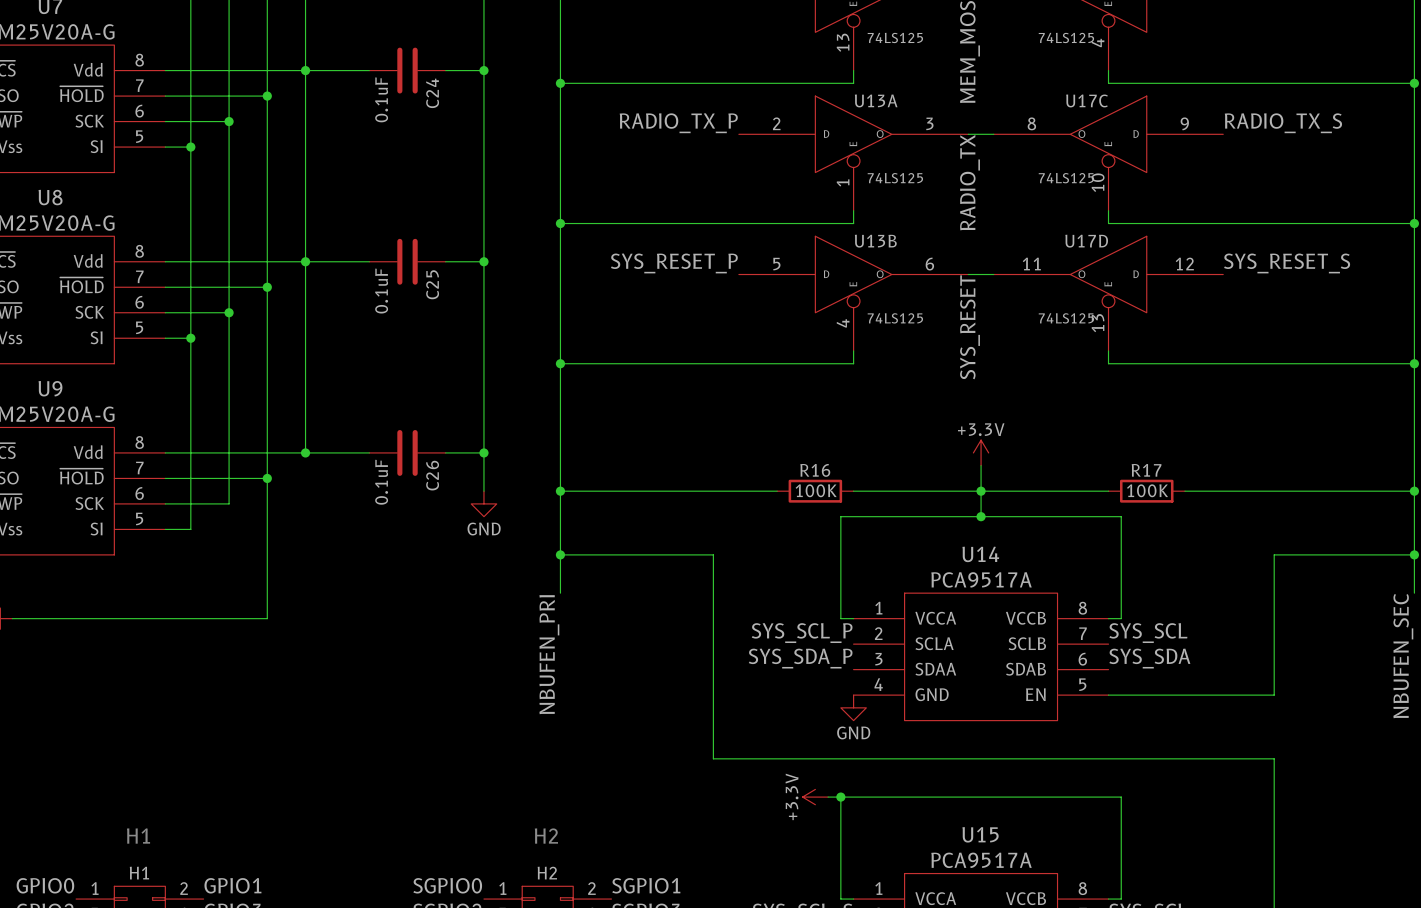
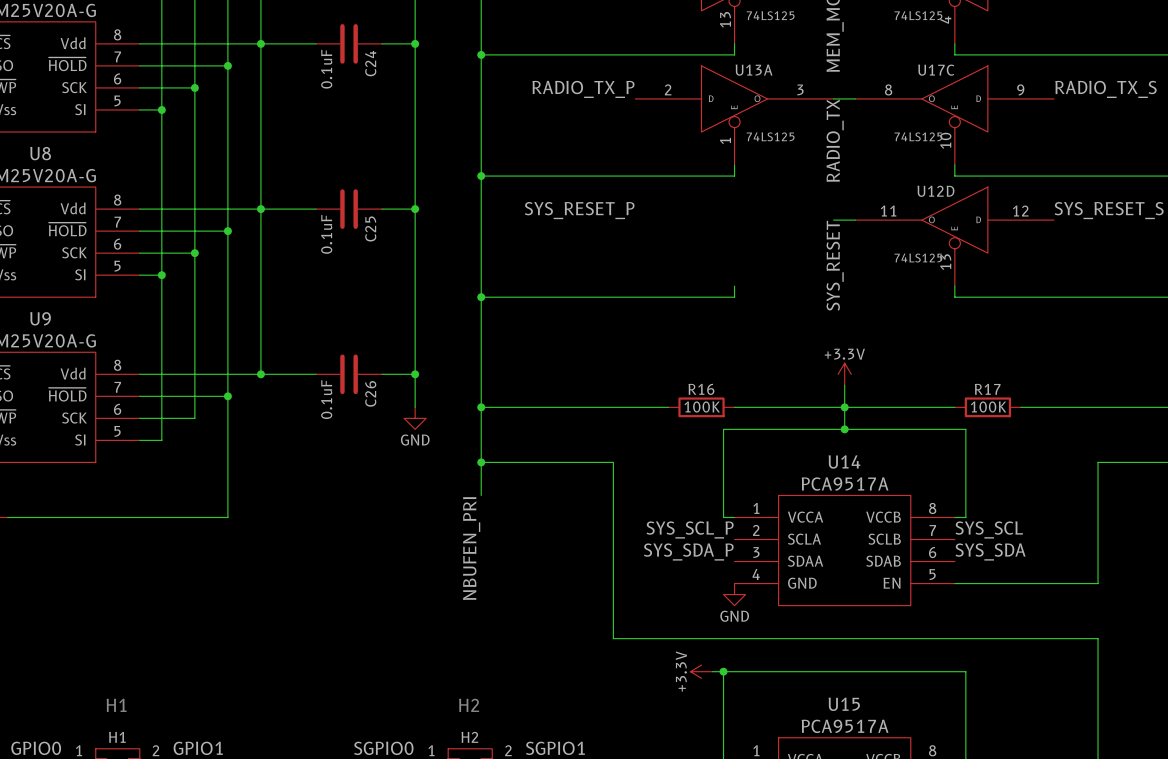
U17D name: U17D (1086, 241) -> U12D (935, 191)
U13B: 74LS125 (853, 293) -> none

